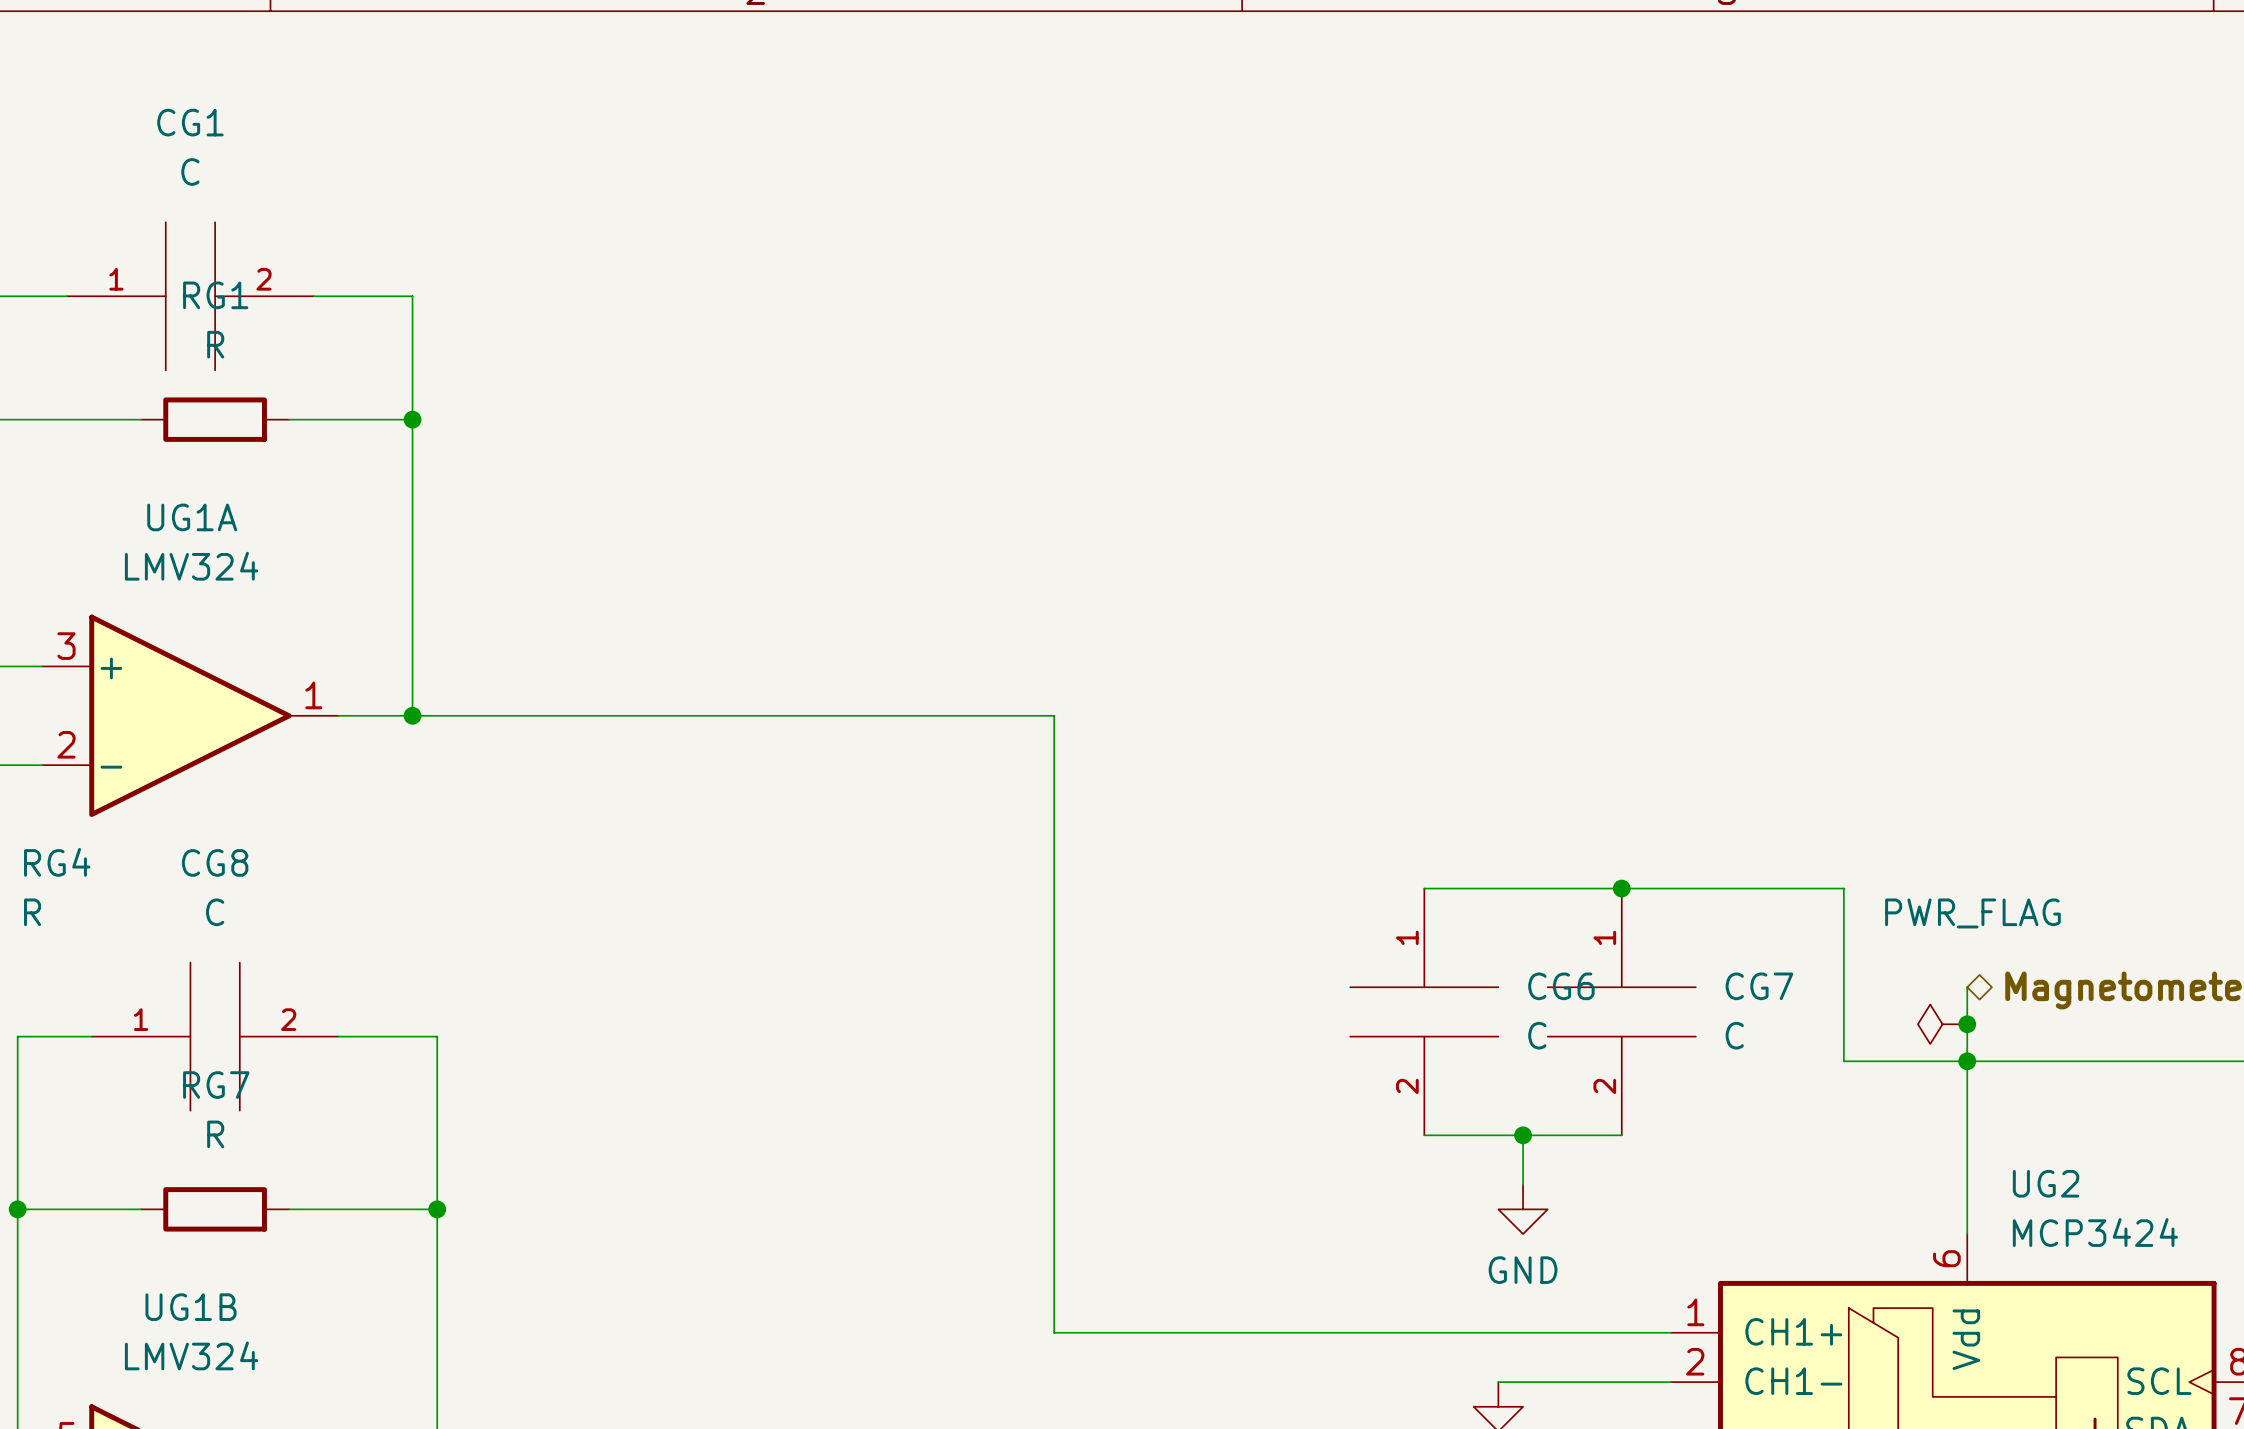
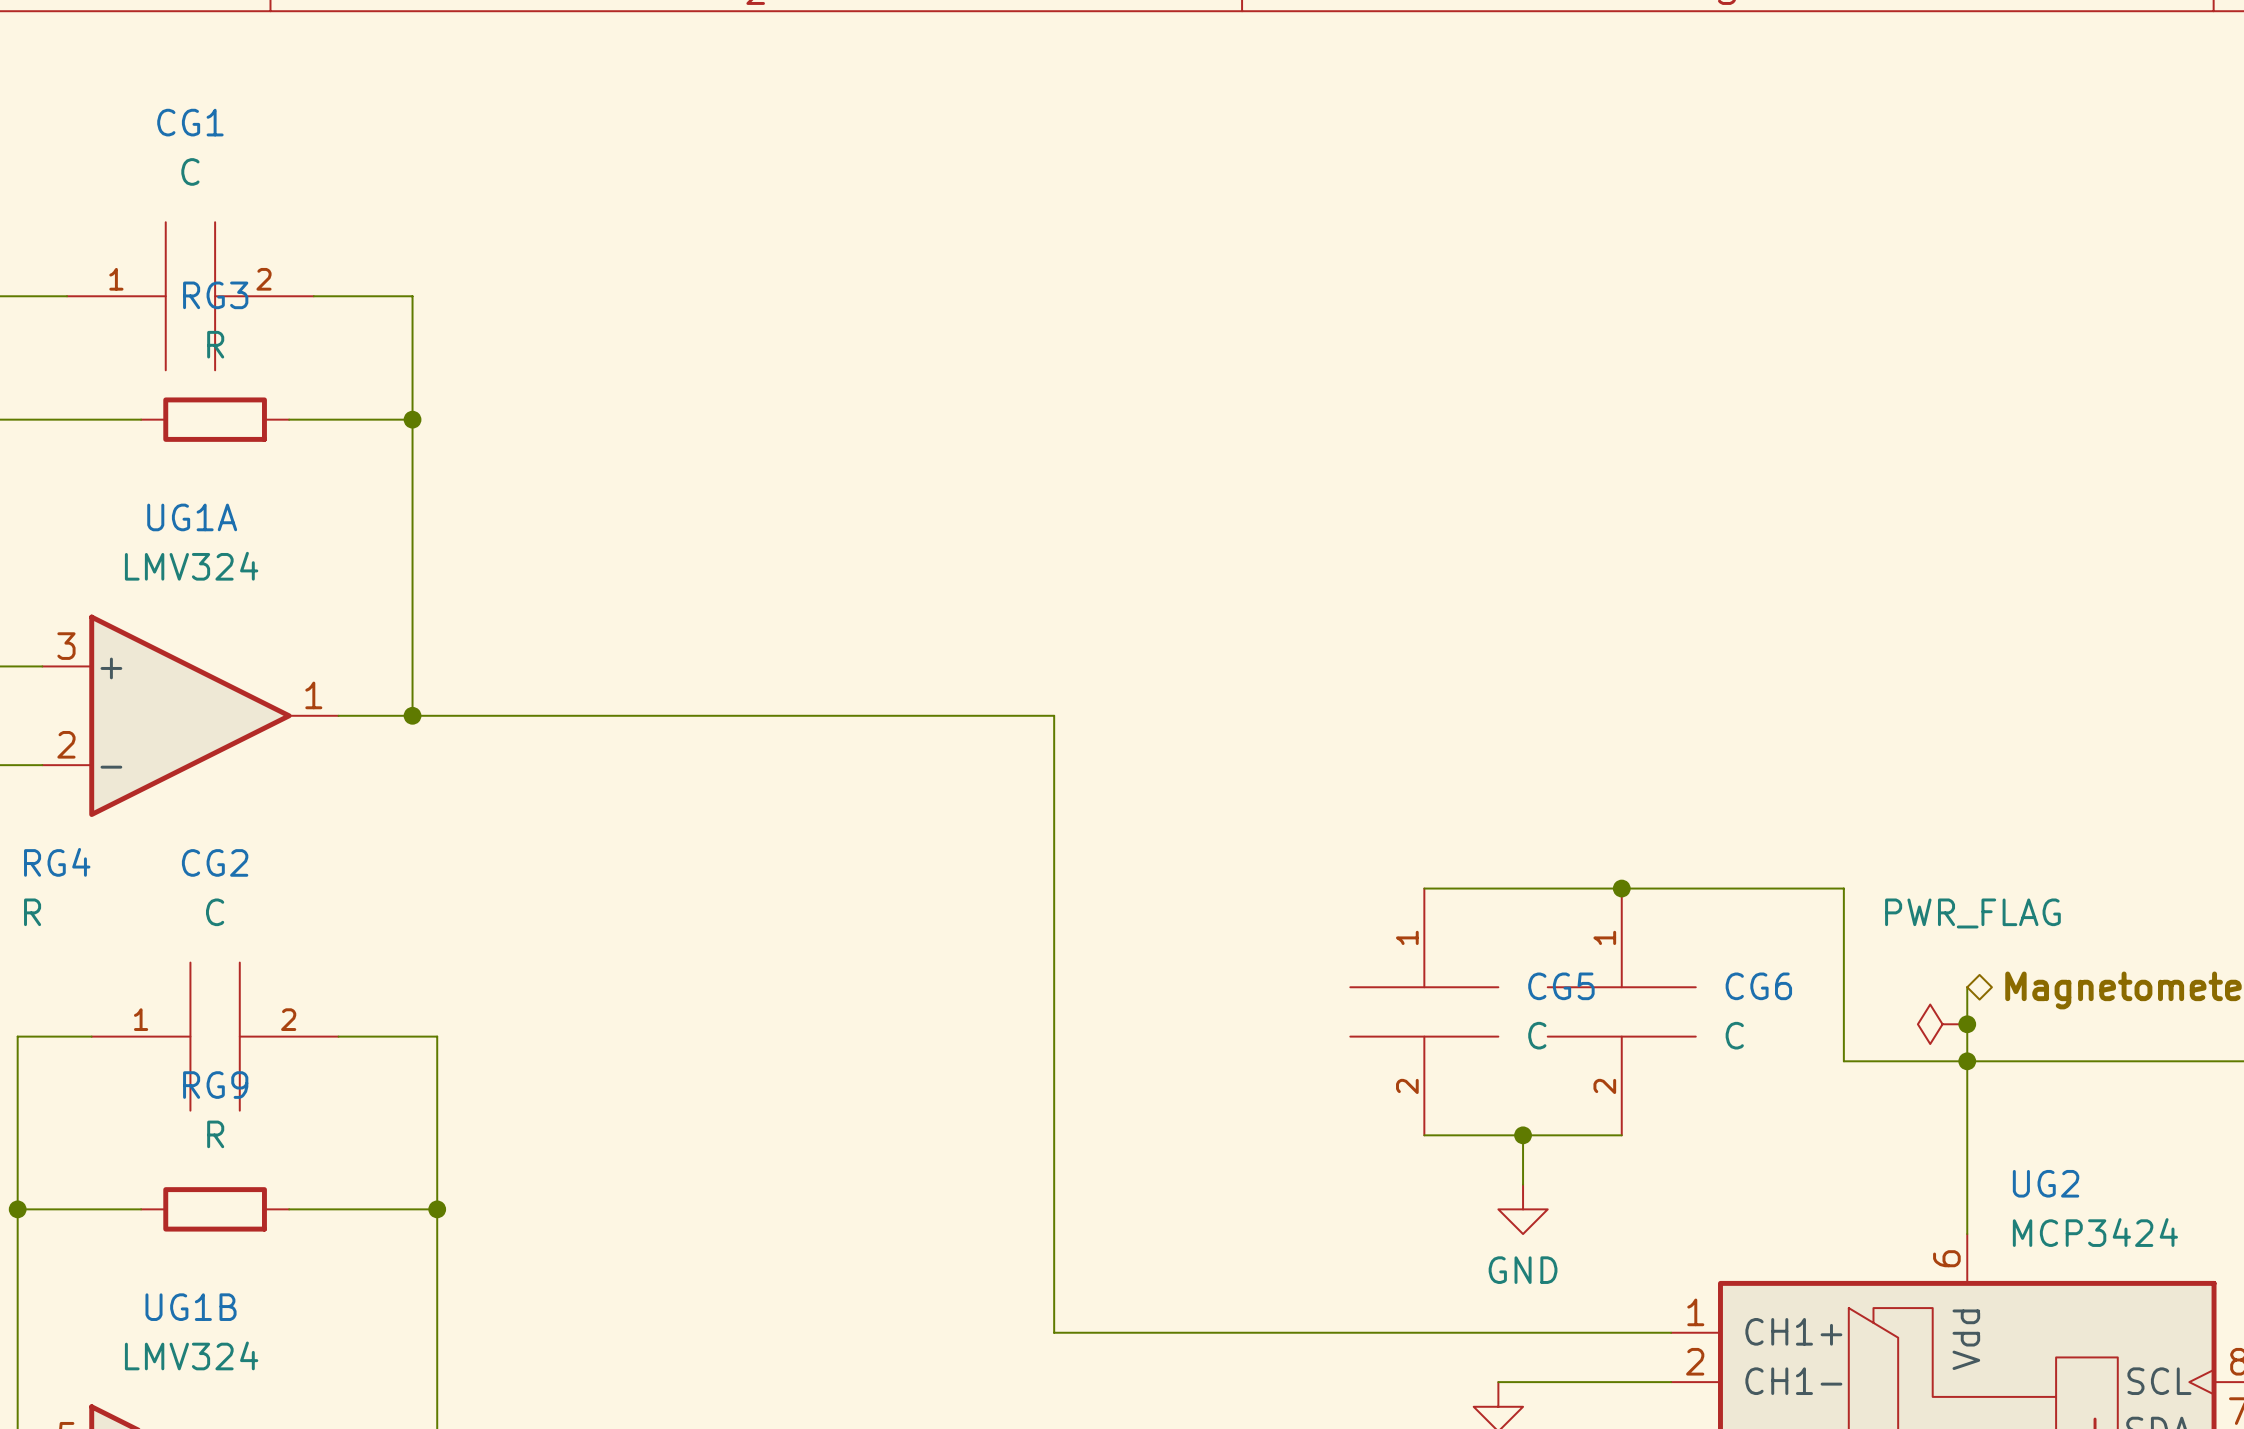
RG1 name: RG1 (215, 295) -> RG3 (215, 295)
CG8 name: CG8 (215, 862) -> CG2 (215, 862)
CG6 name: CG6 (1561, 986) -> CG5 (1561, 986)
CG7 name: CG7 (1759, 986) -> CG6 (1758, 986)
RG7 name: RG7 (216, 1085) -> RG9 (215, 1085)

